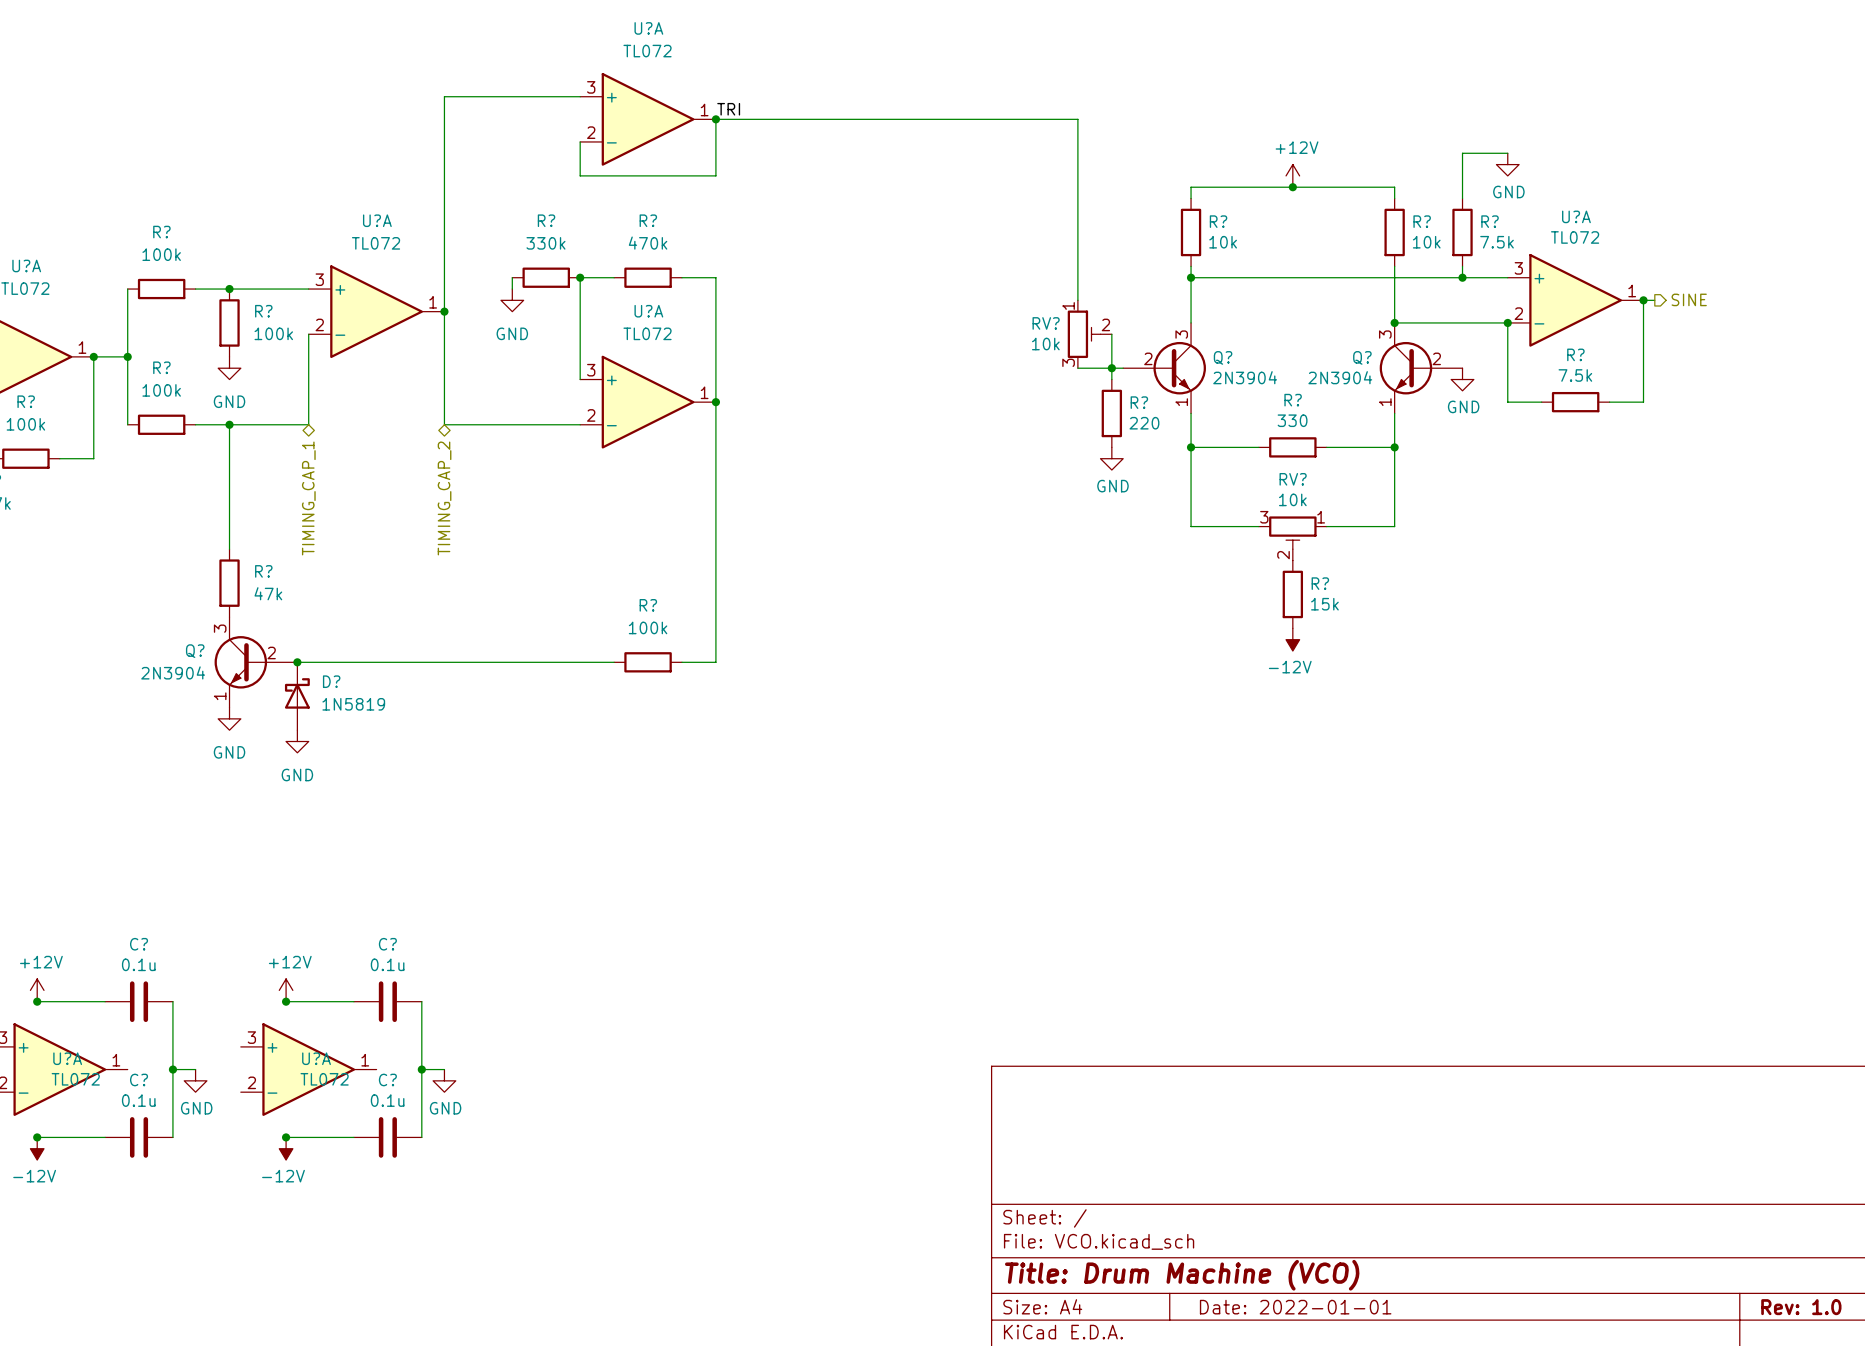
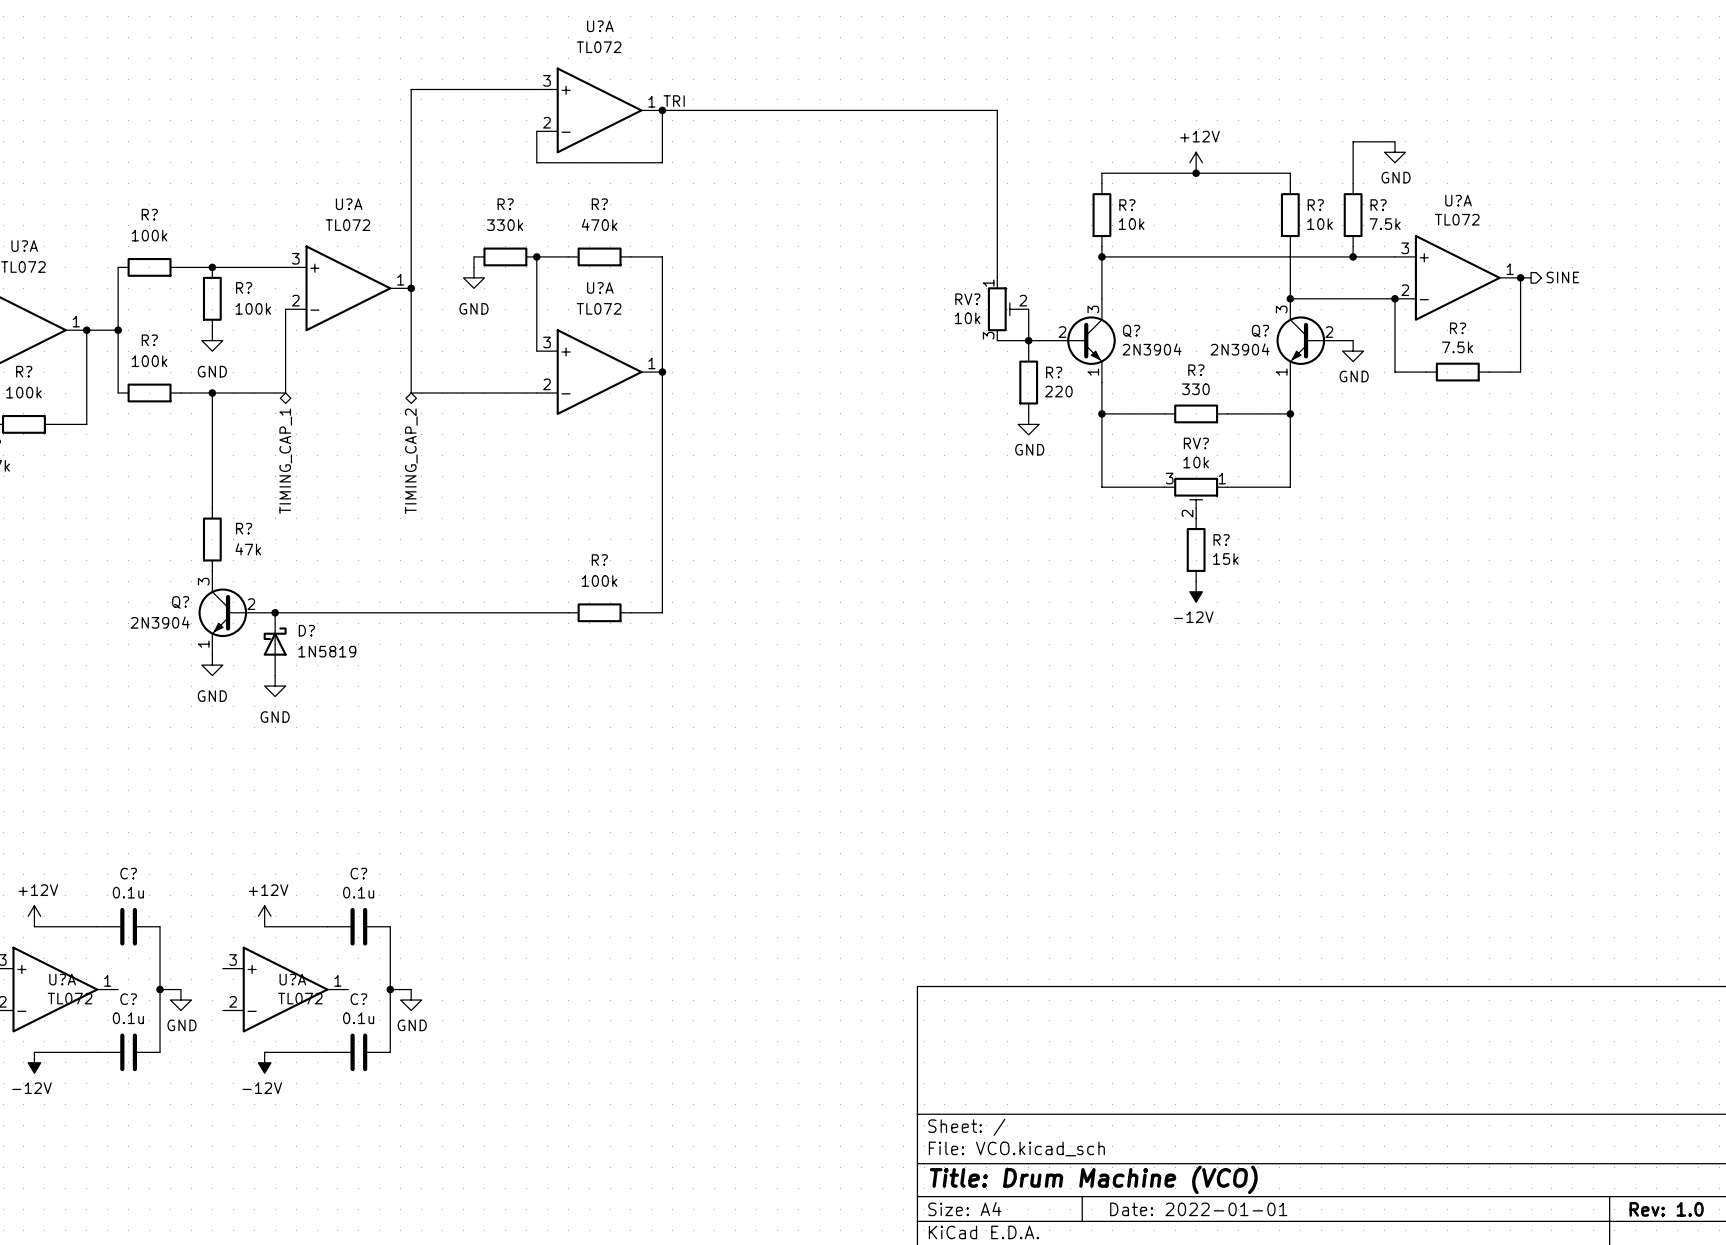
junction: (37, 1001) -> none
junction: (286, 1001) -> none
junction: (37, 1137) -> none
junction: (286, 1137) -> none

